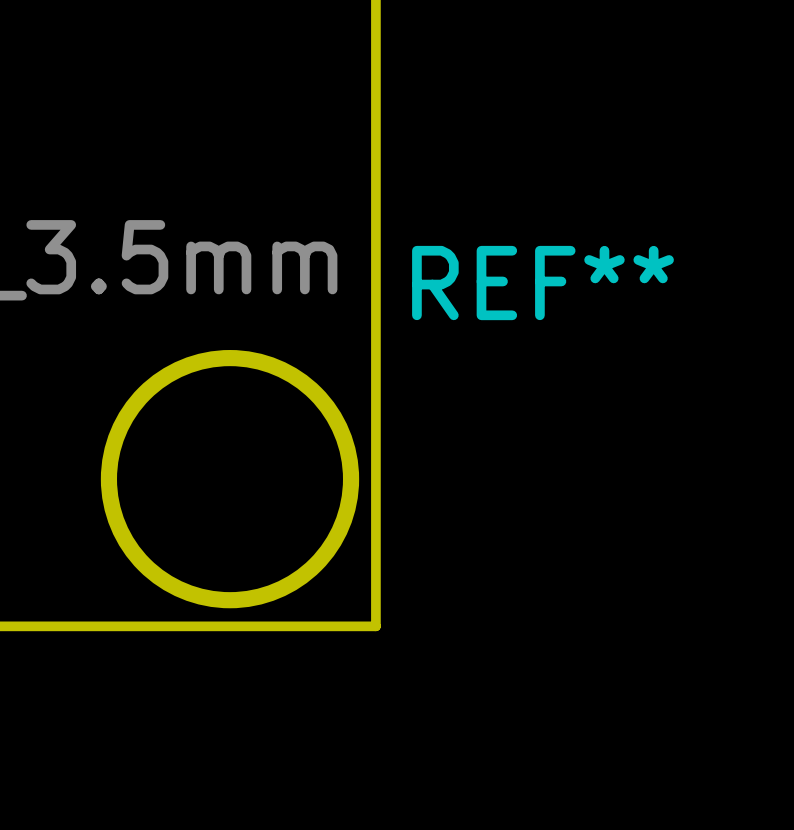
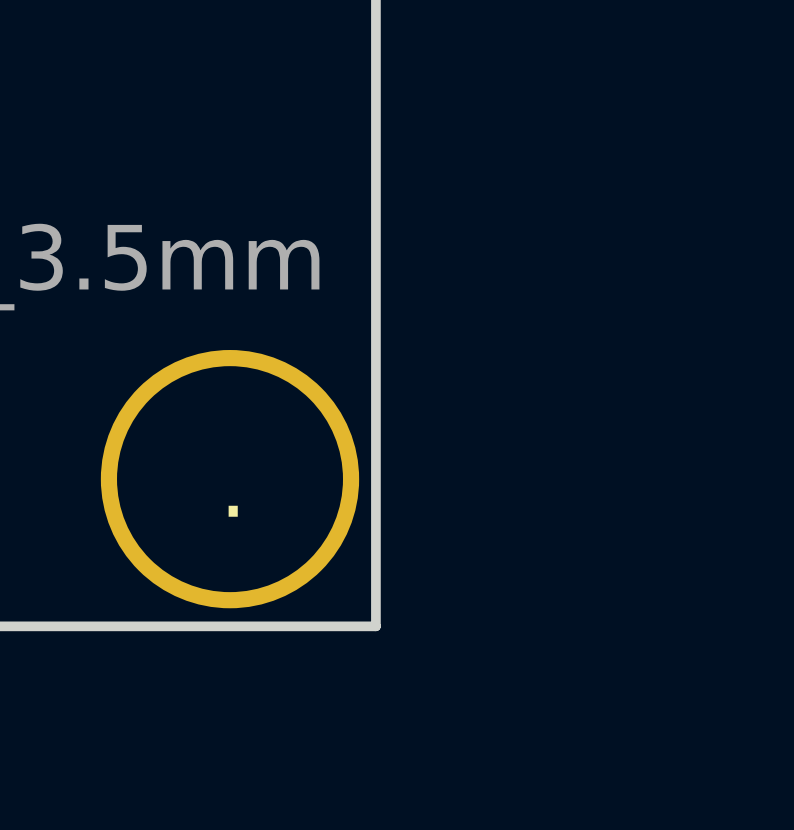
REF** name: REF** (542, 283) -> . (233, 511)

